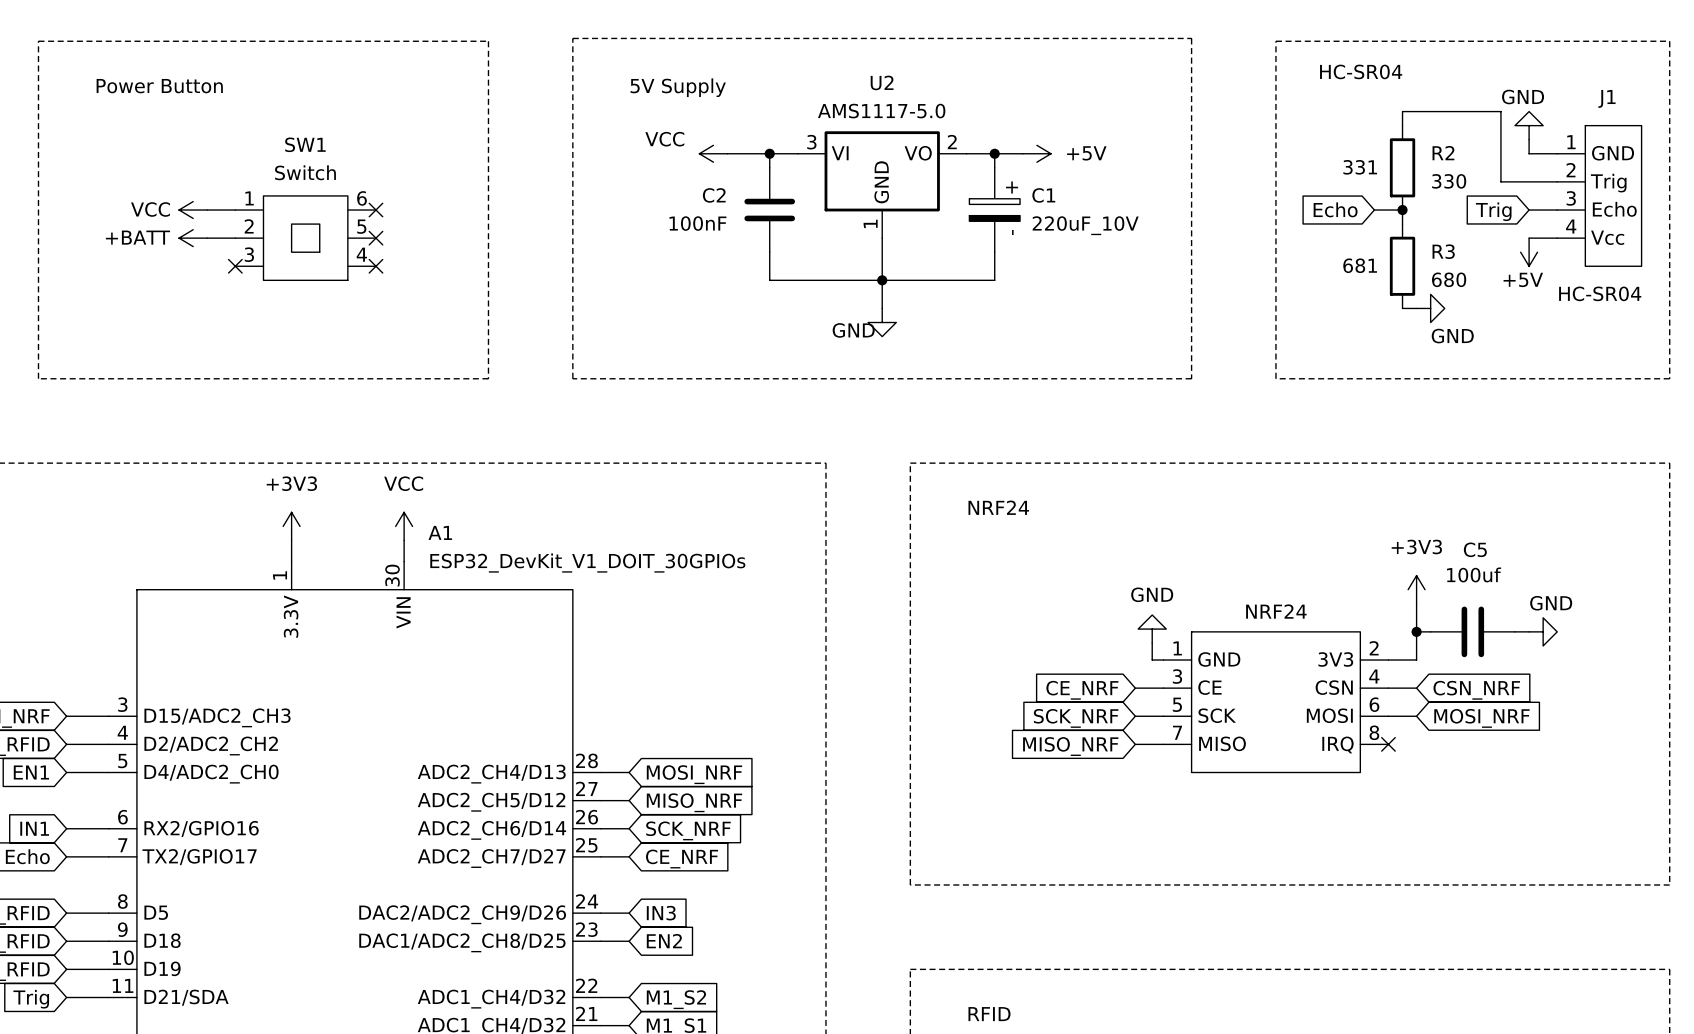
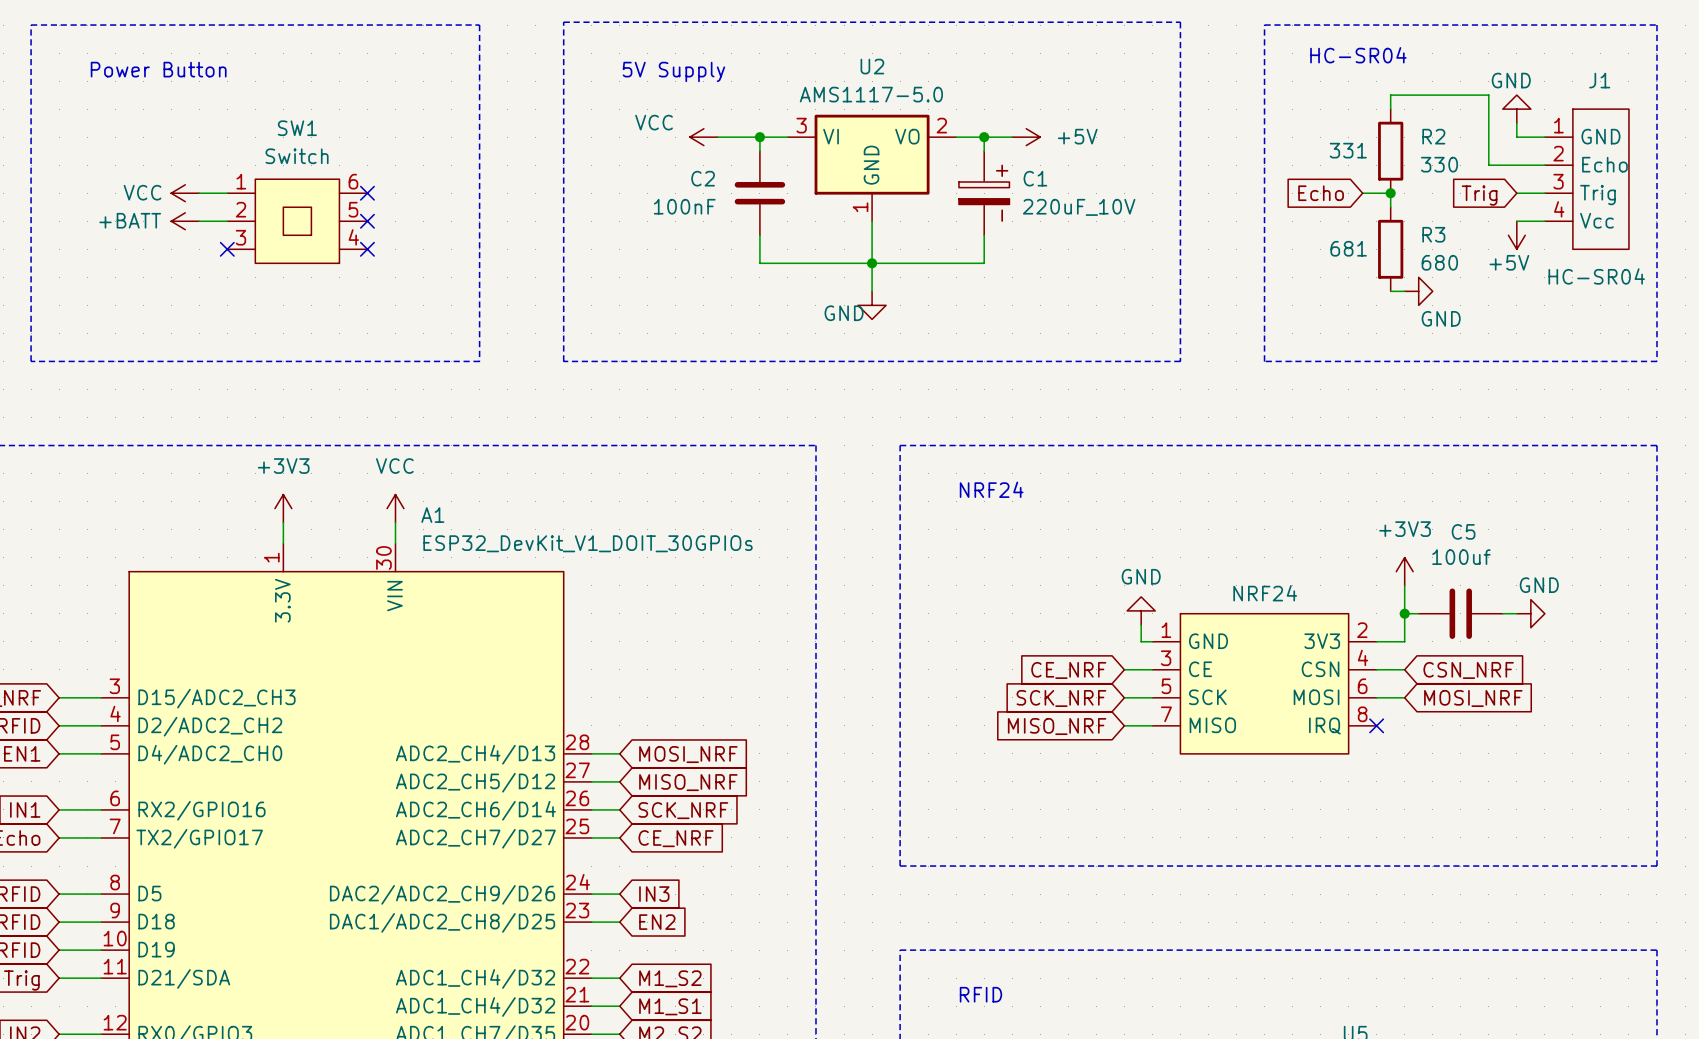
J1 pin name: Trig (1608, 183) -> Echo (1604, 164)
J1 pin name: Echo (1614, 209) -> Trig (1597, 195)

